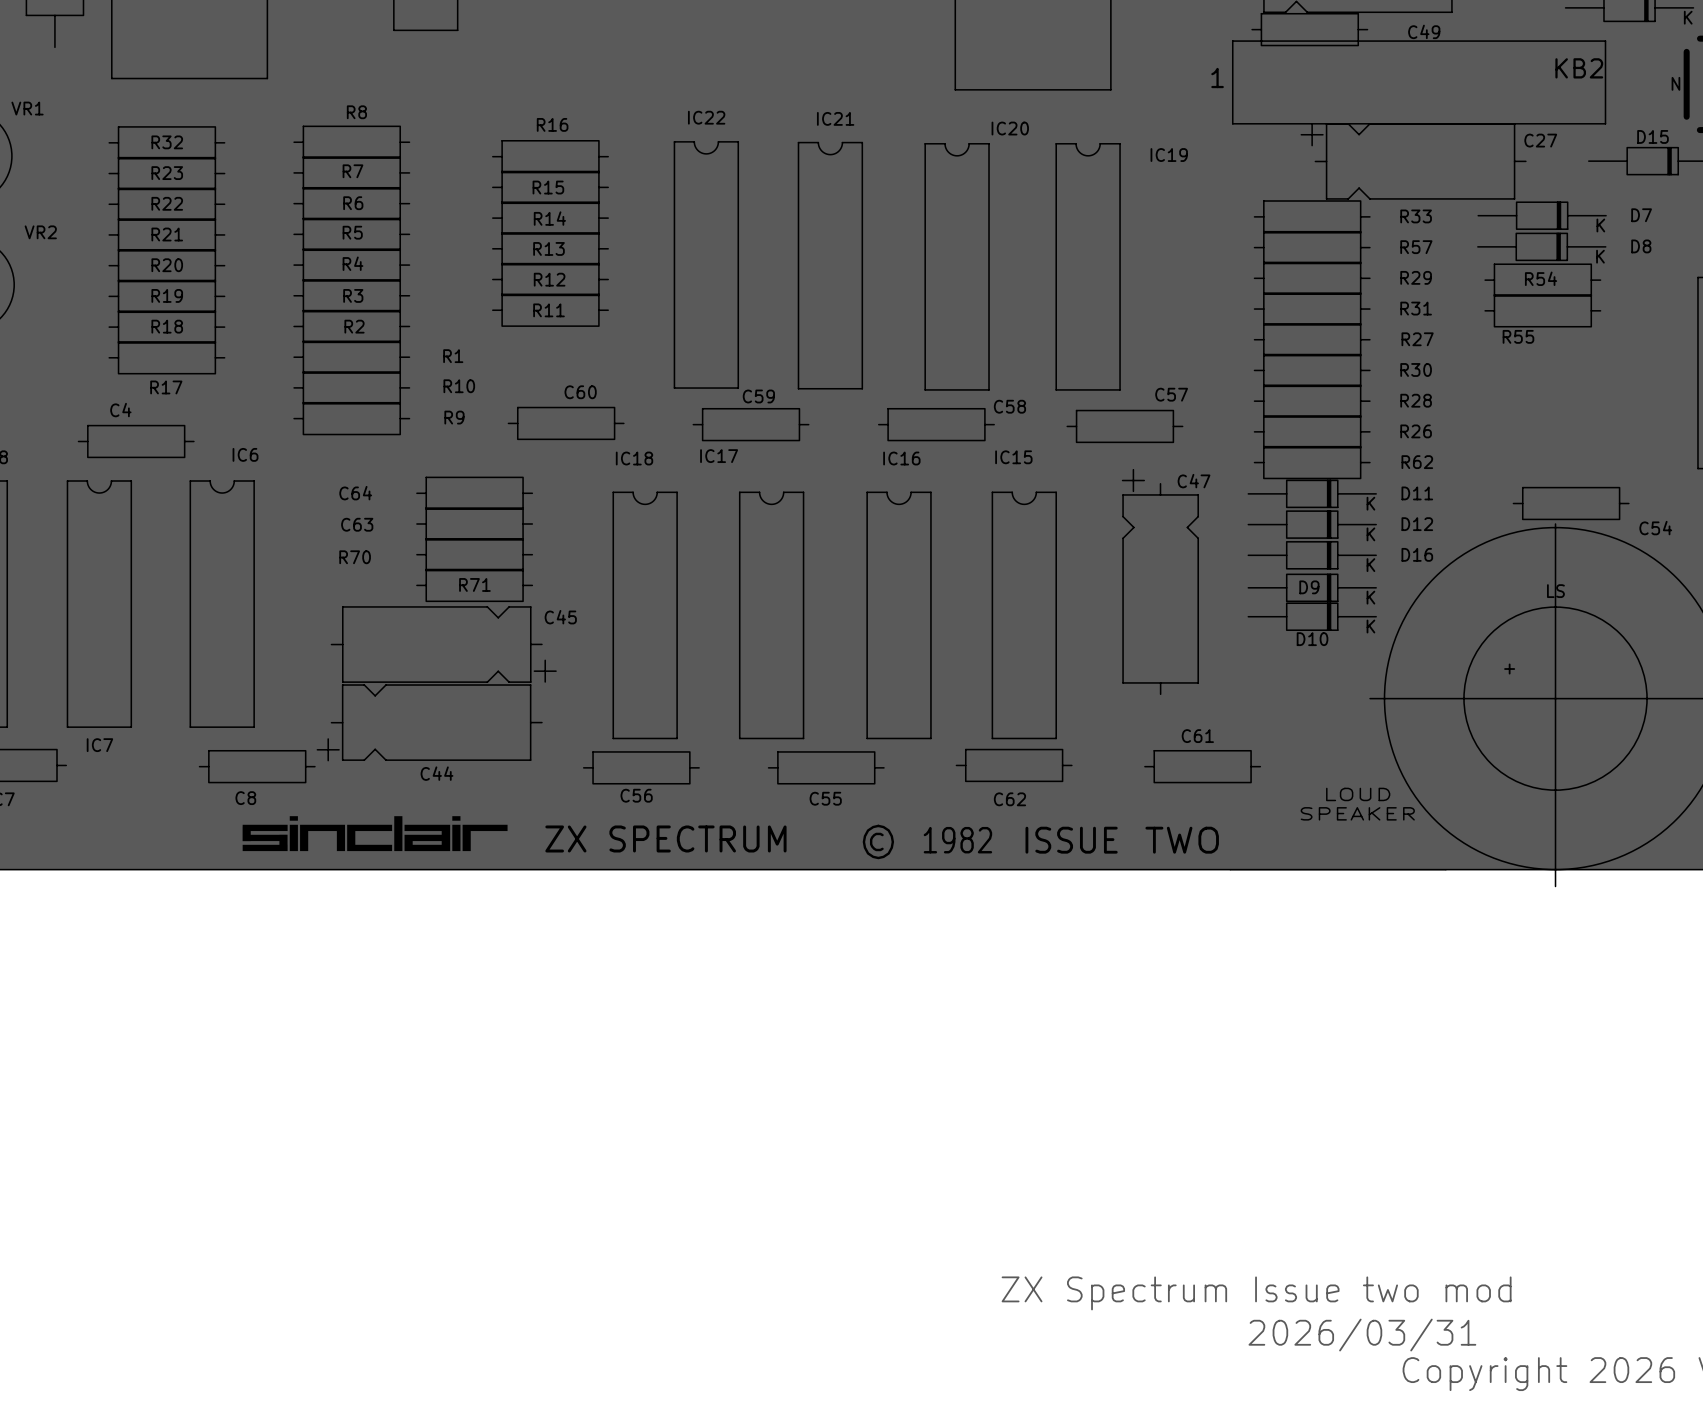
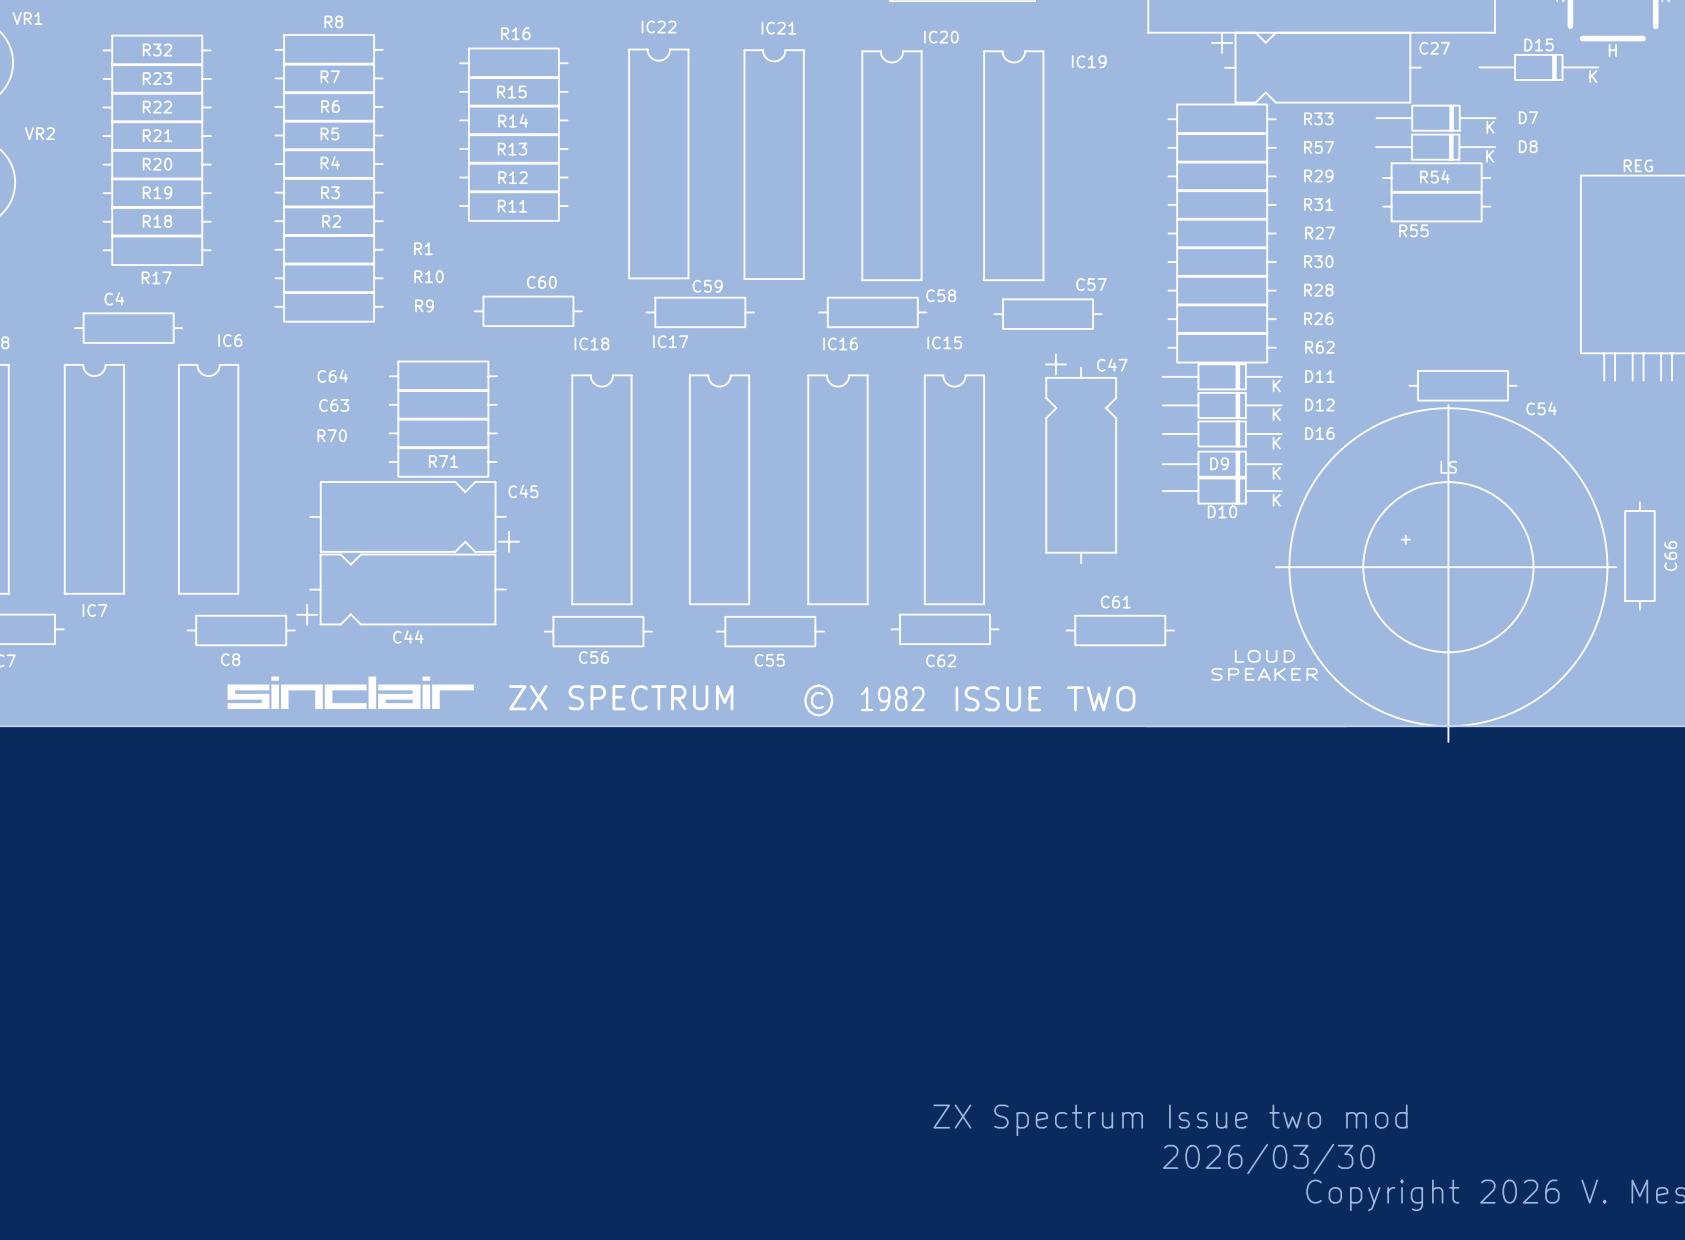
text: 2026/03/31 (1362, 1335) -> 2026/03/30 (1268, 1159)

